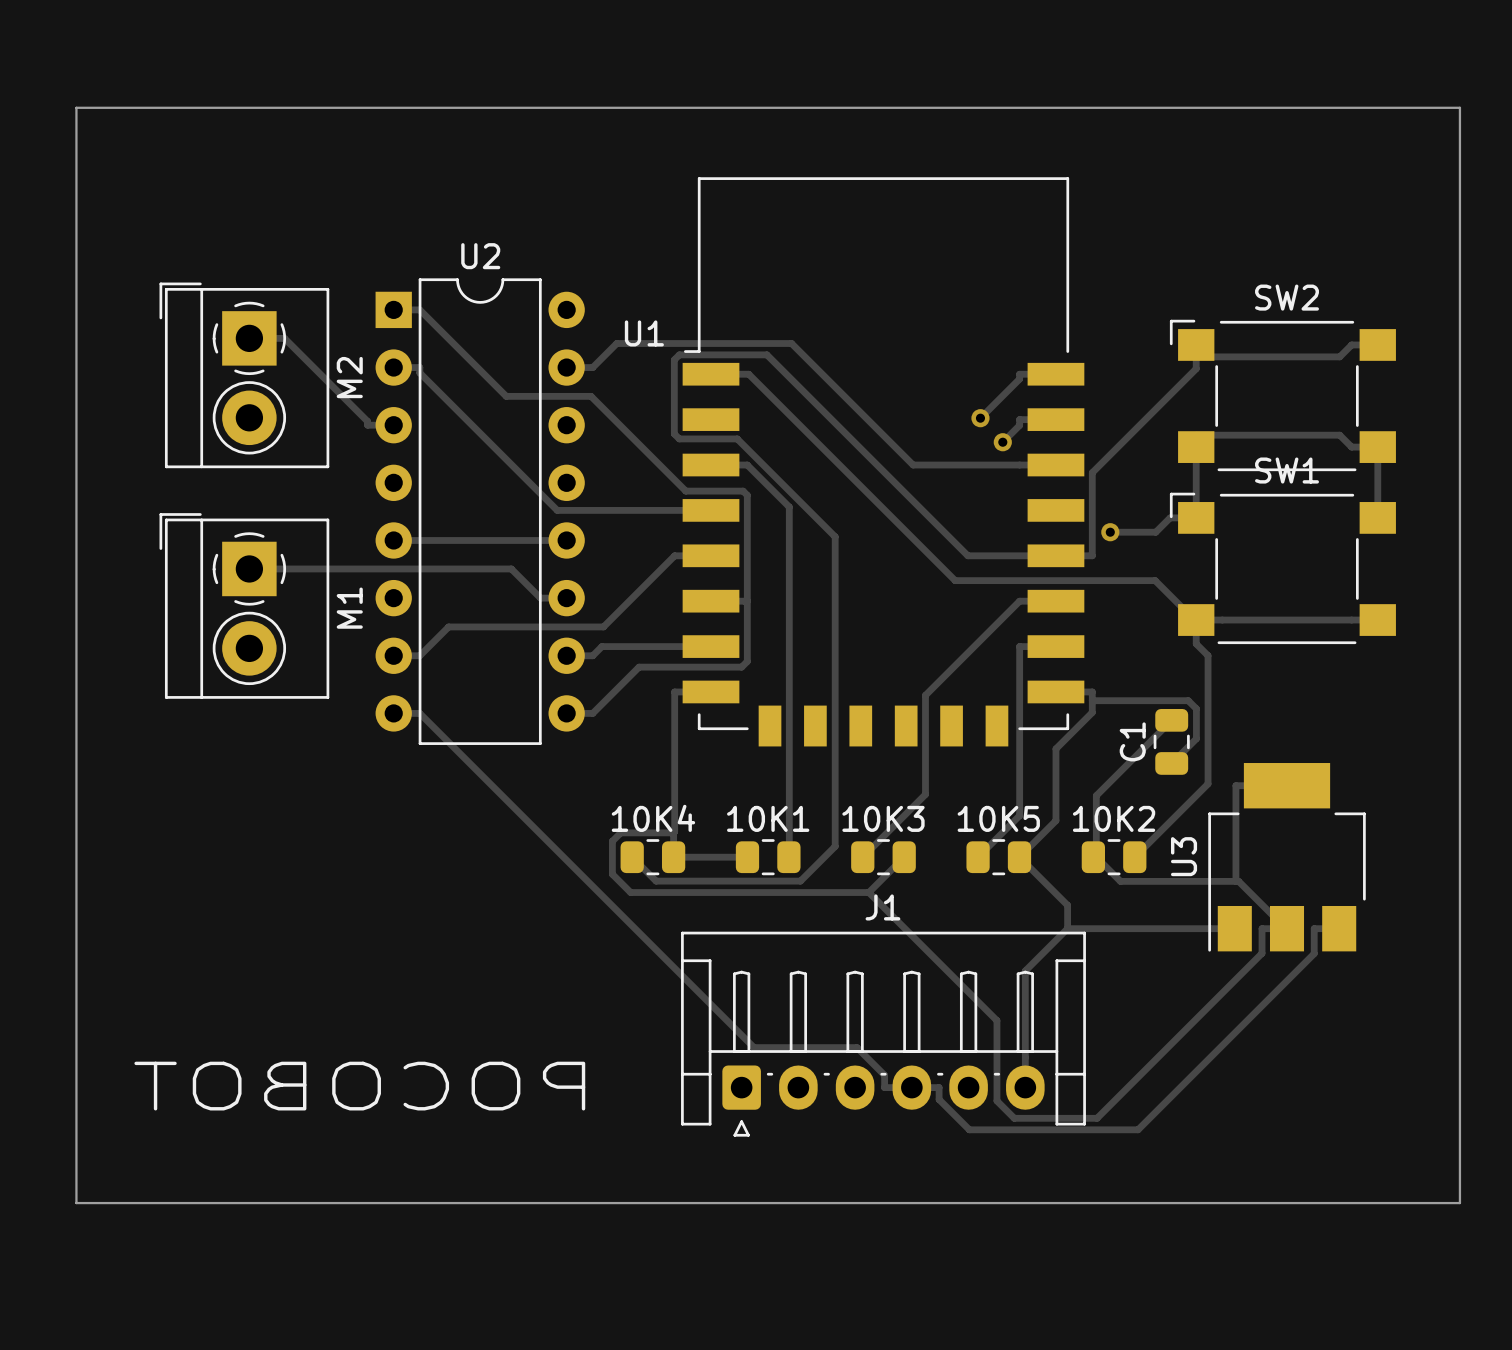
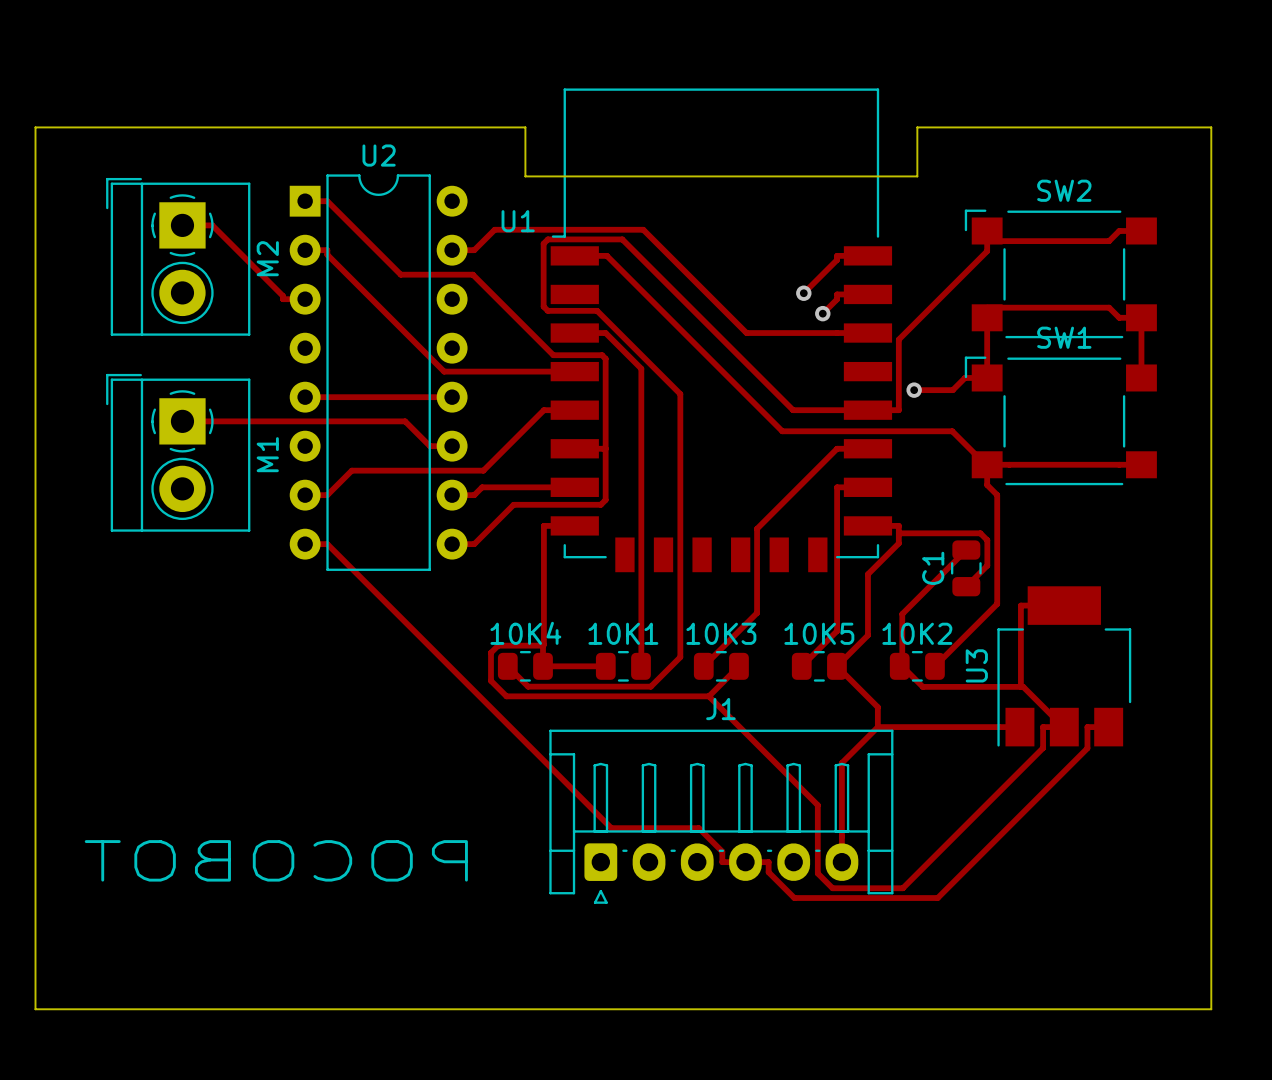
board edge: (76, 223) (76, 107) (1459, 107) (1459, 223) -> (35, 127) (525, 127) (525, 176) (917, 176) (917, 127) (1211, 127)
board edge: (76, 1203) (1459, 1203) -> (35, 960) (35, 1009) (1211, 1009) (1211, 960)

